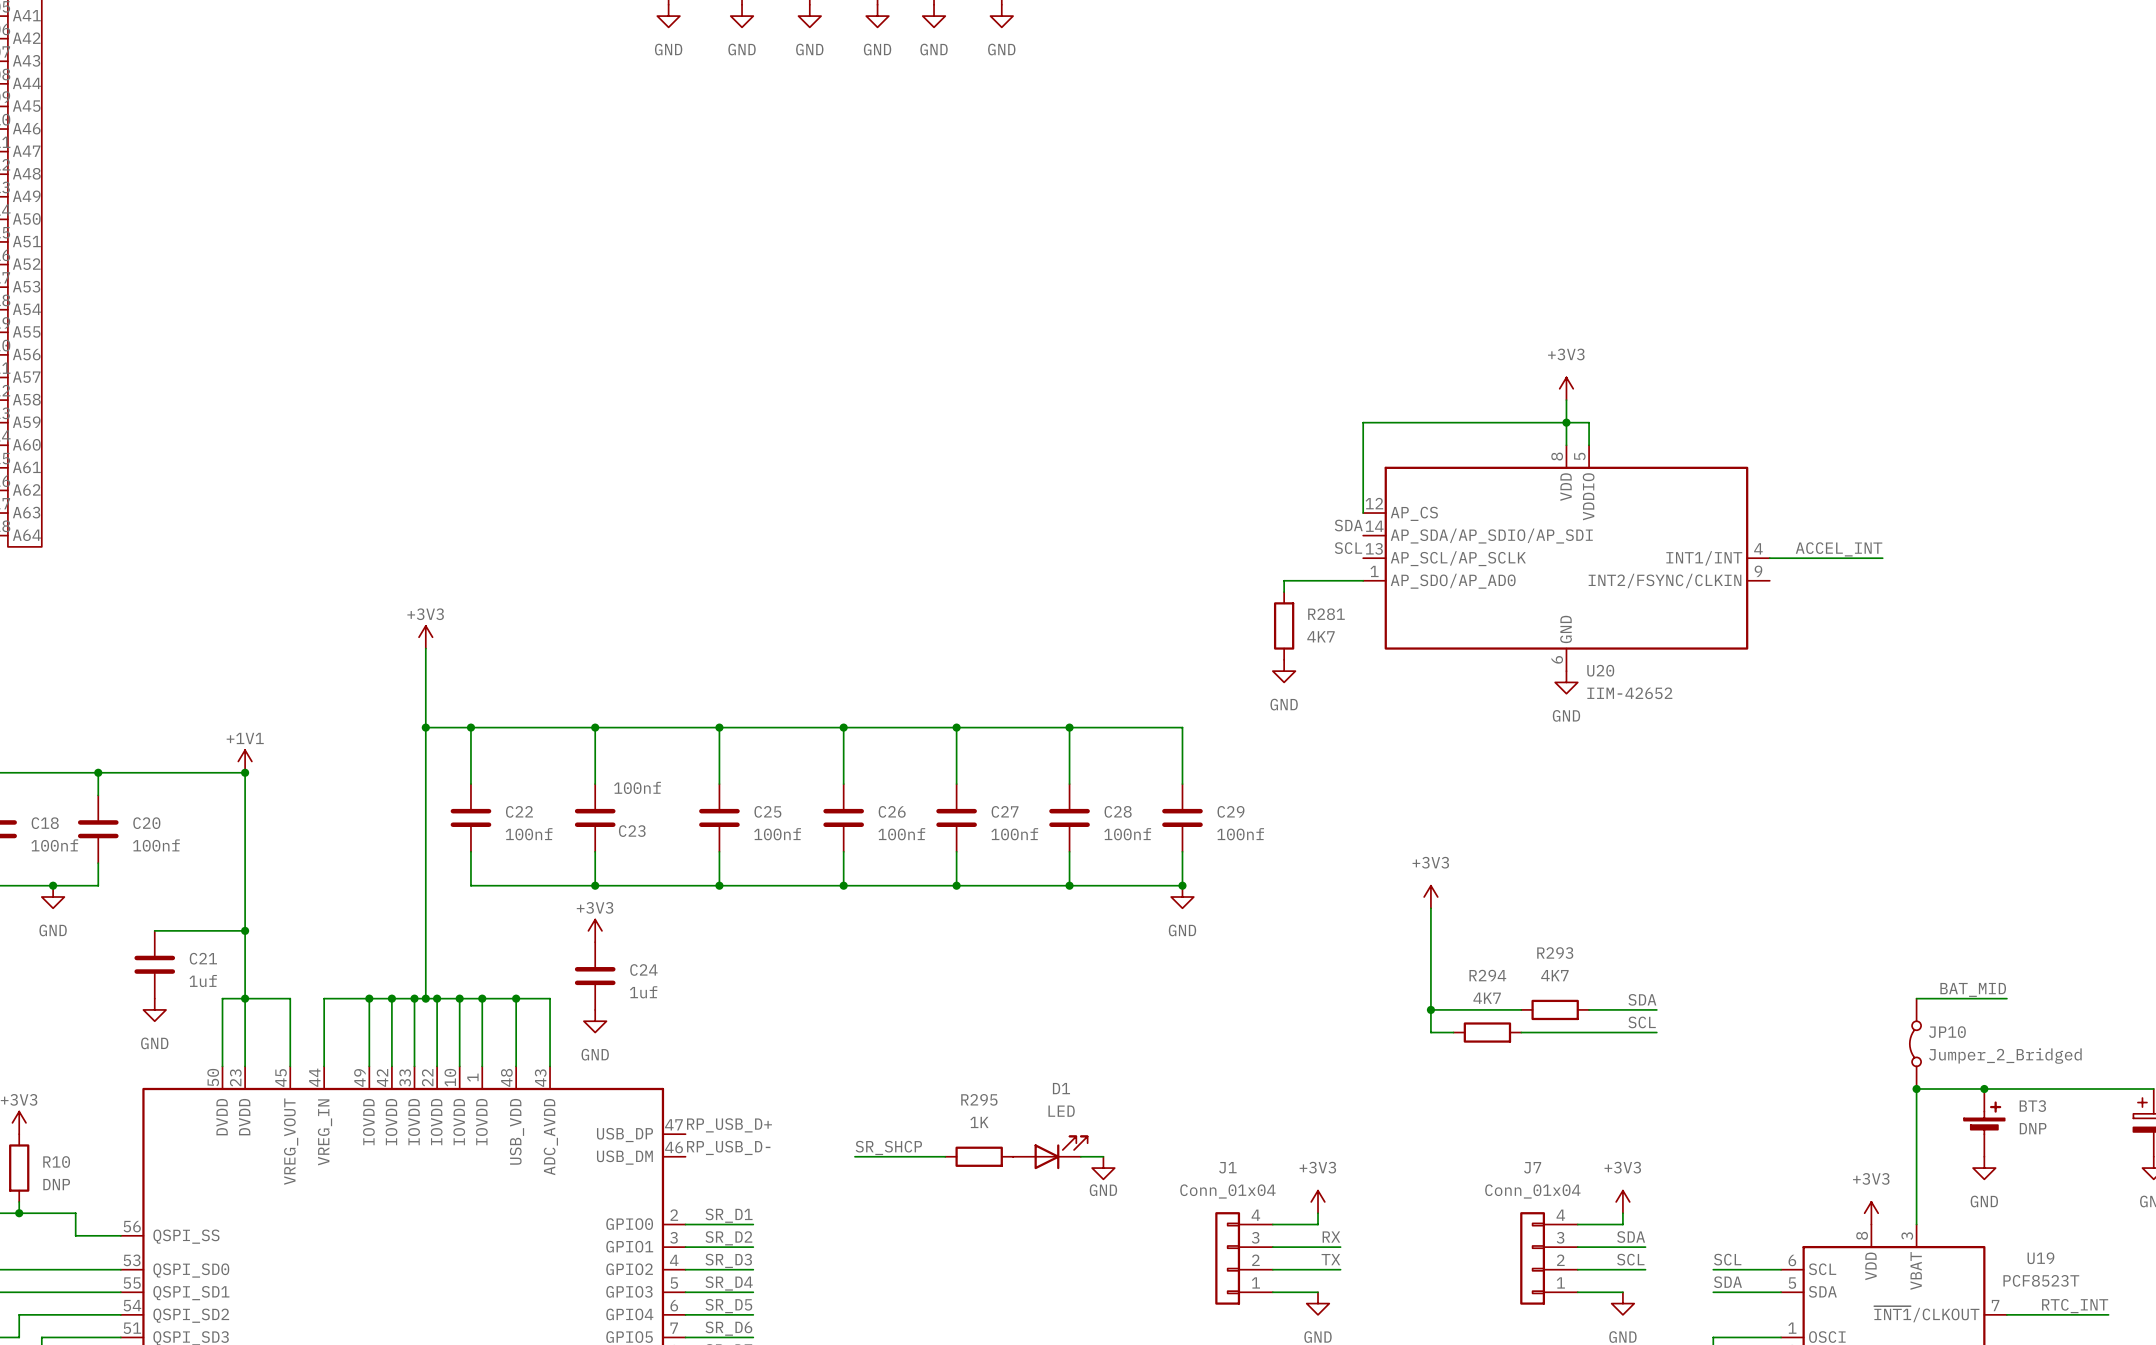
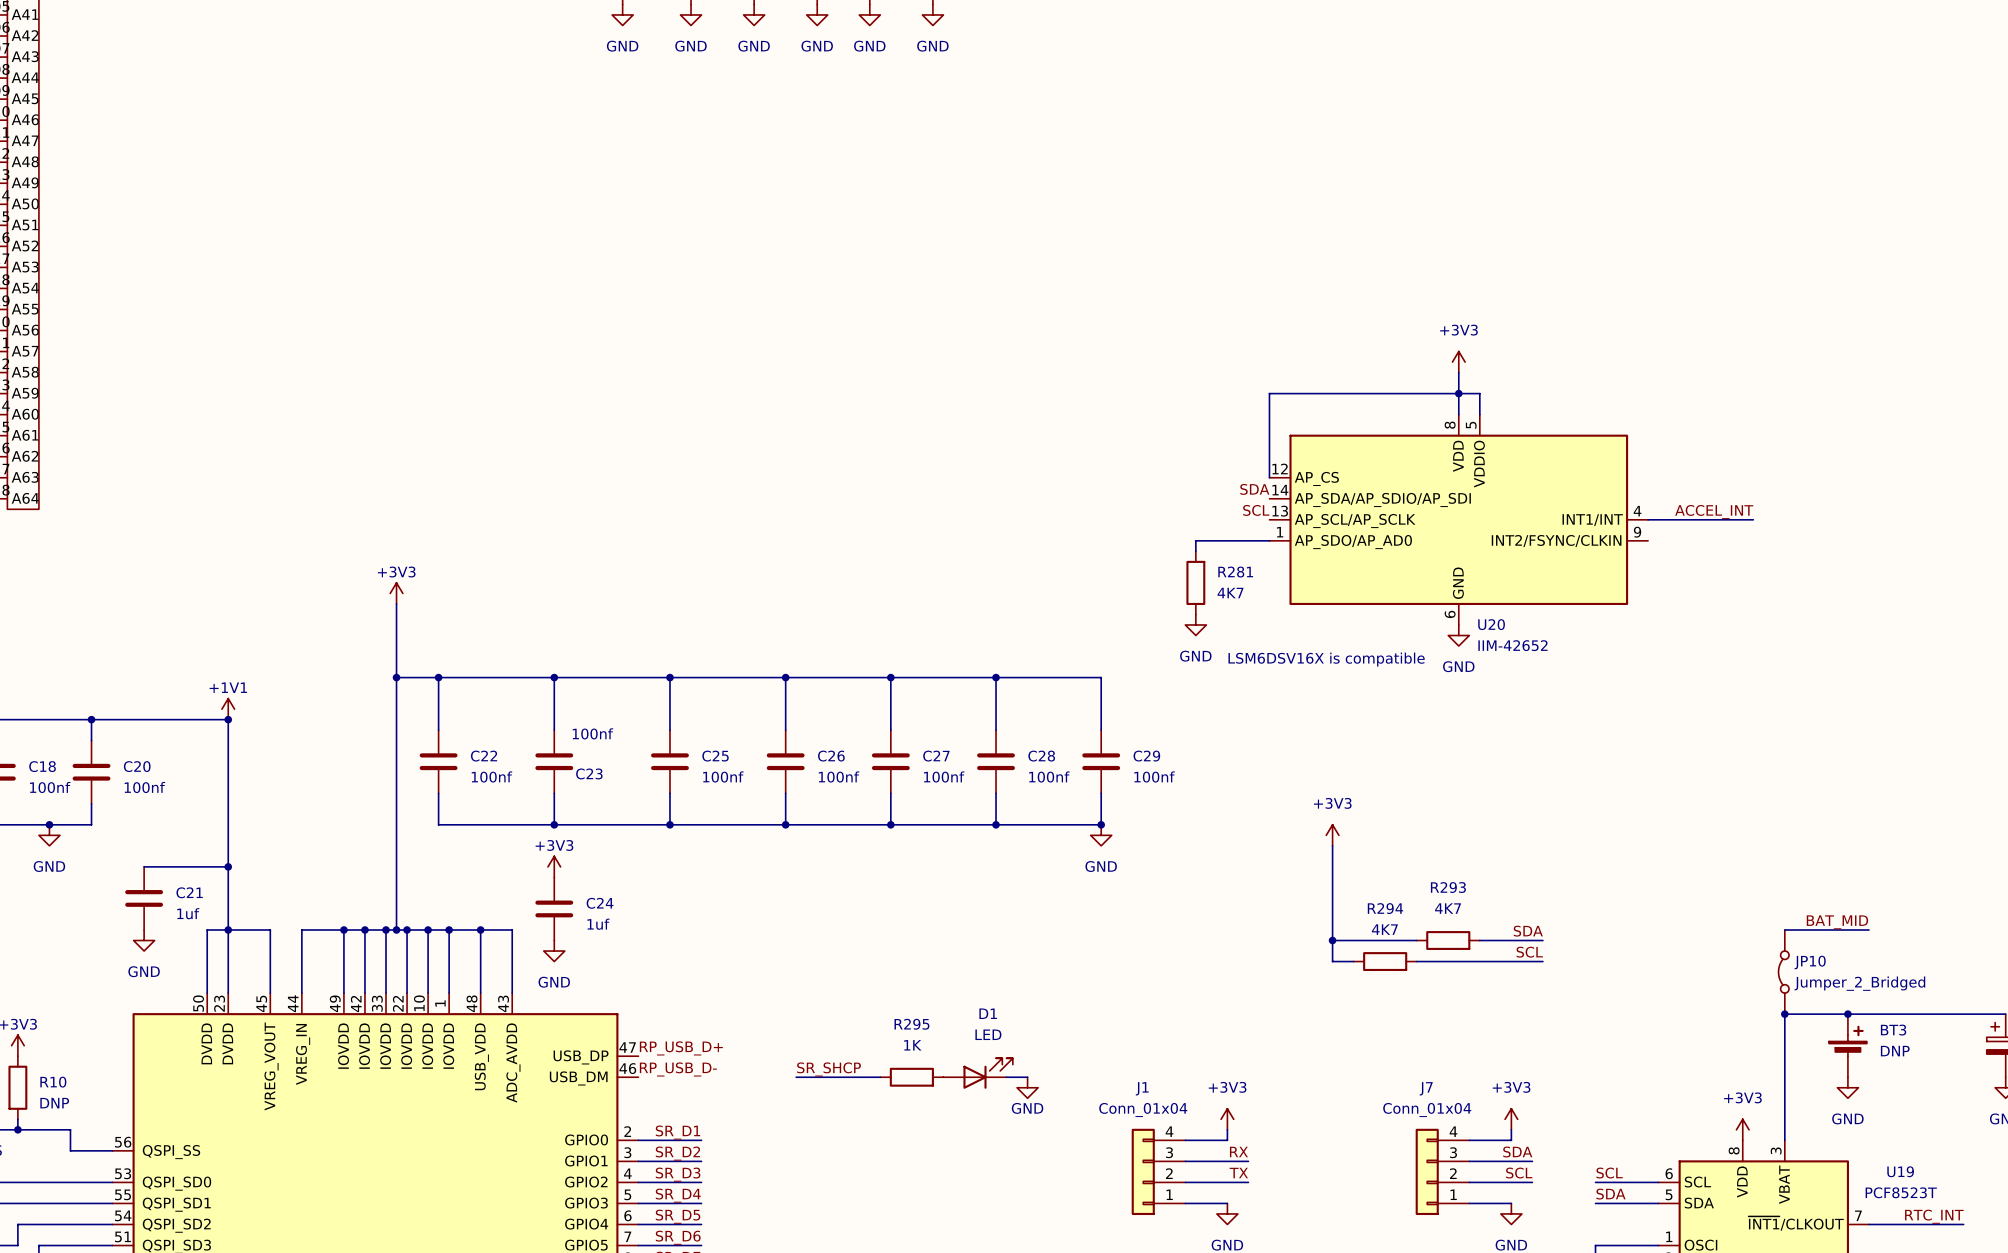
text: none -> LSM6DSV16X is compatible (1326, 659)

